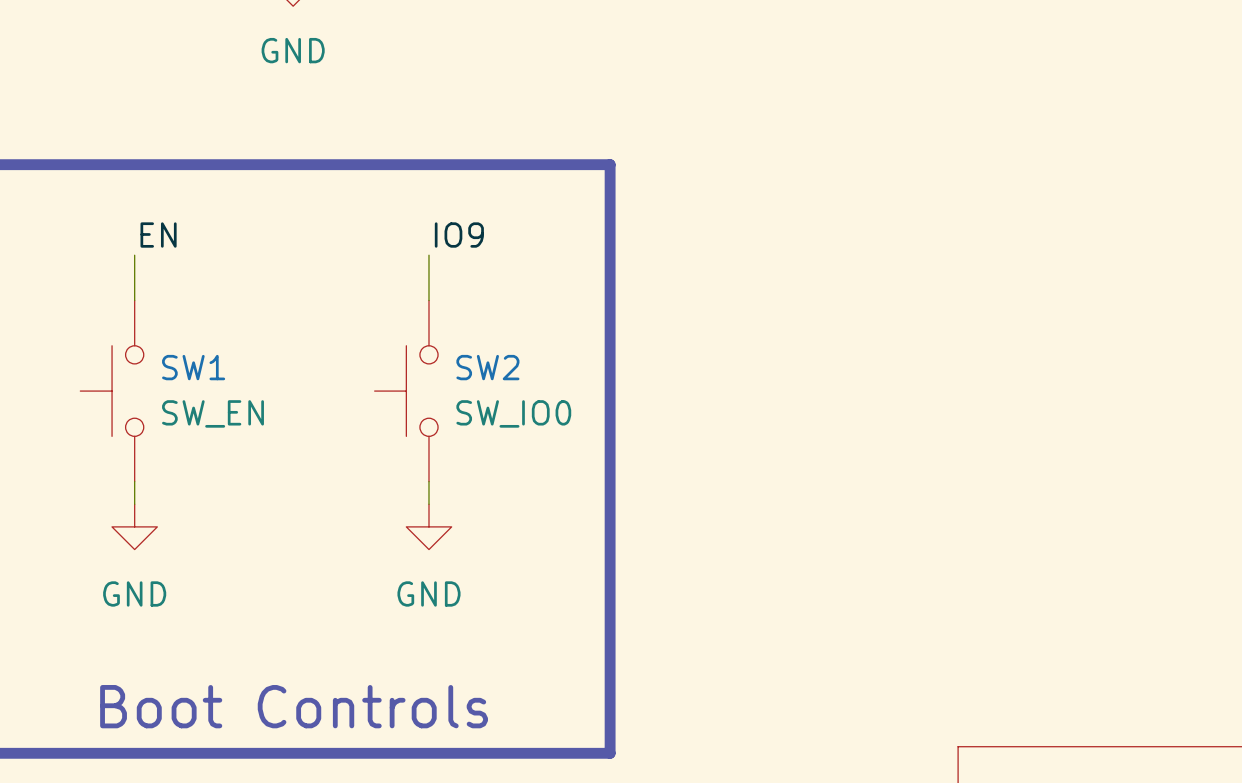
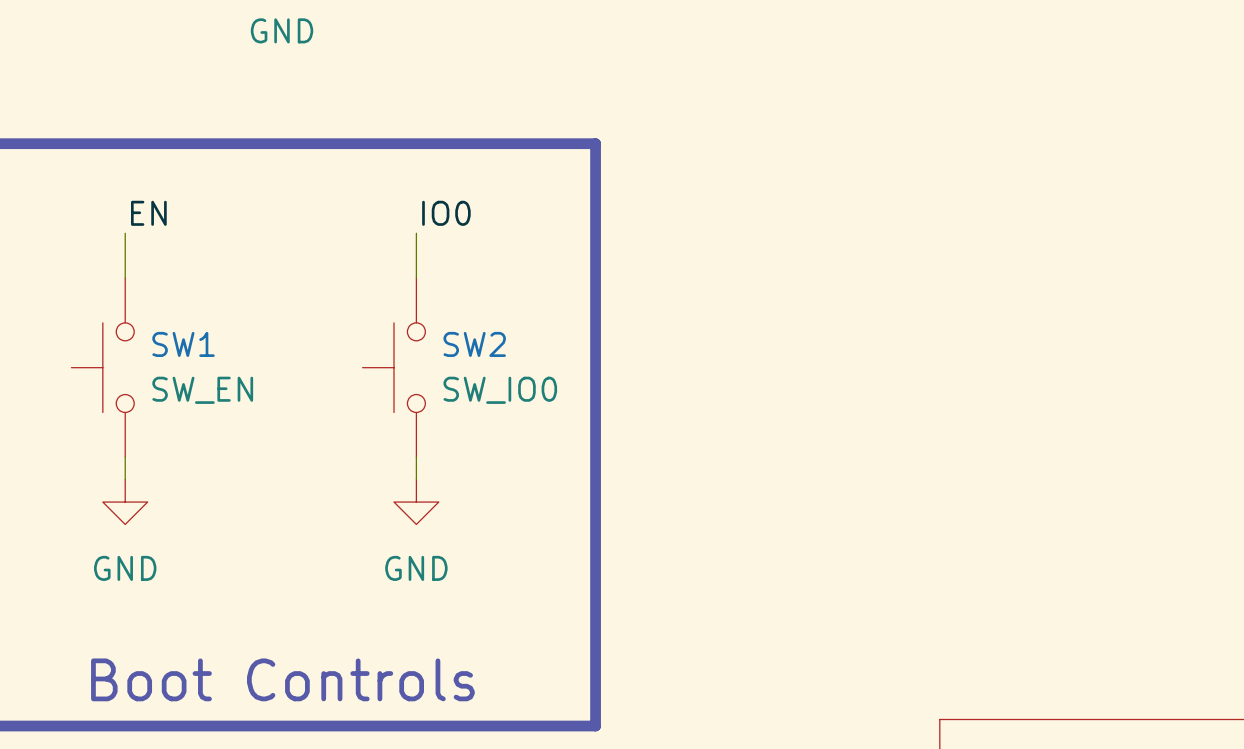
label: IO9 (459, 235) -> IO0 (446, 213)

